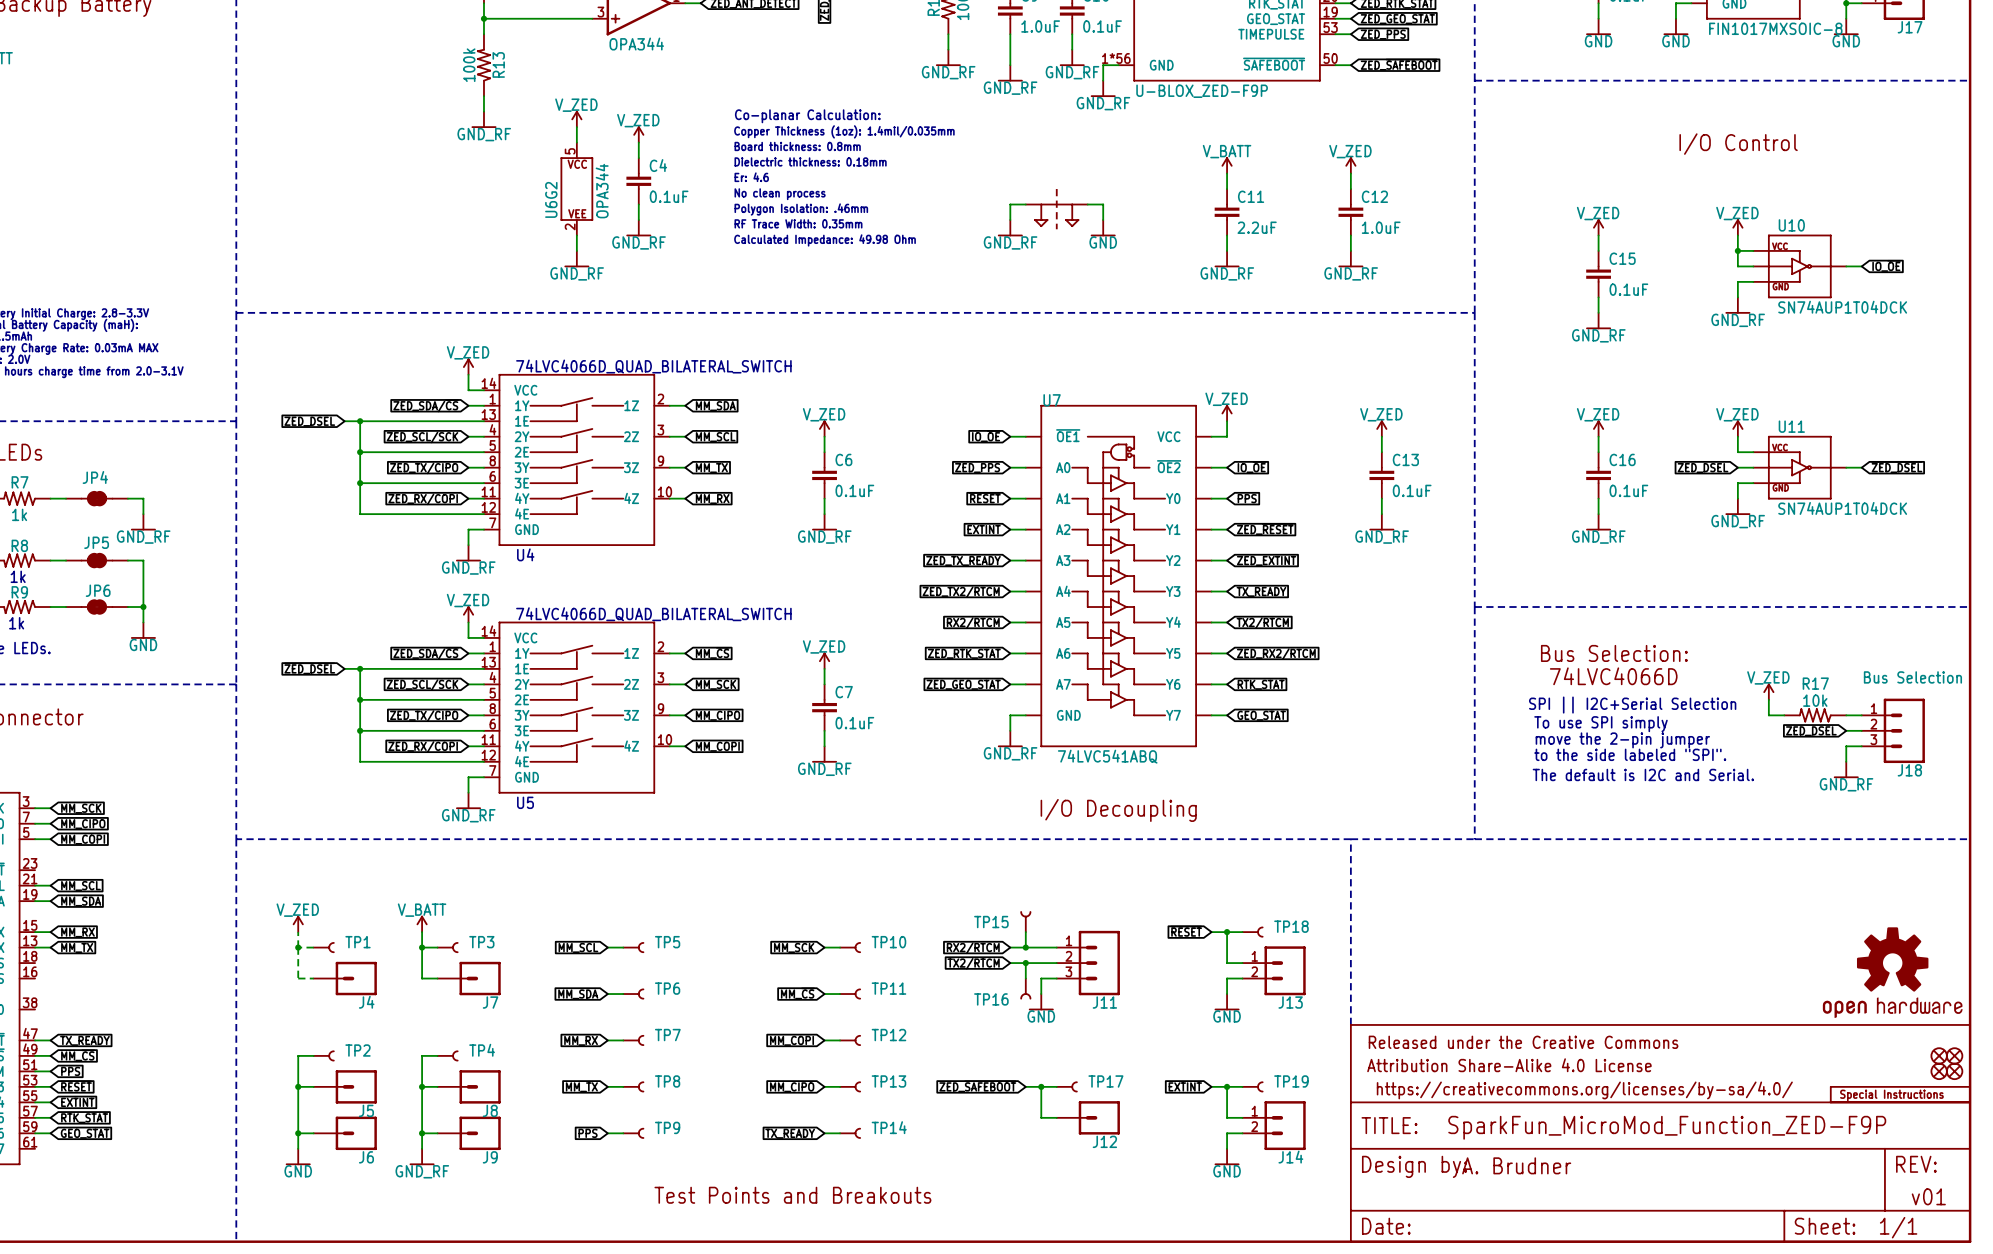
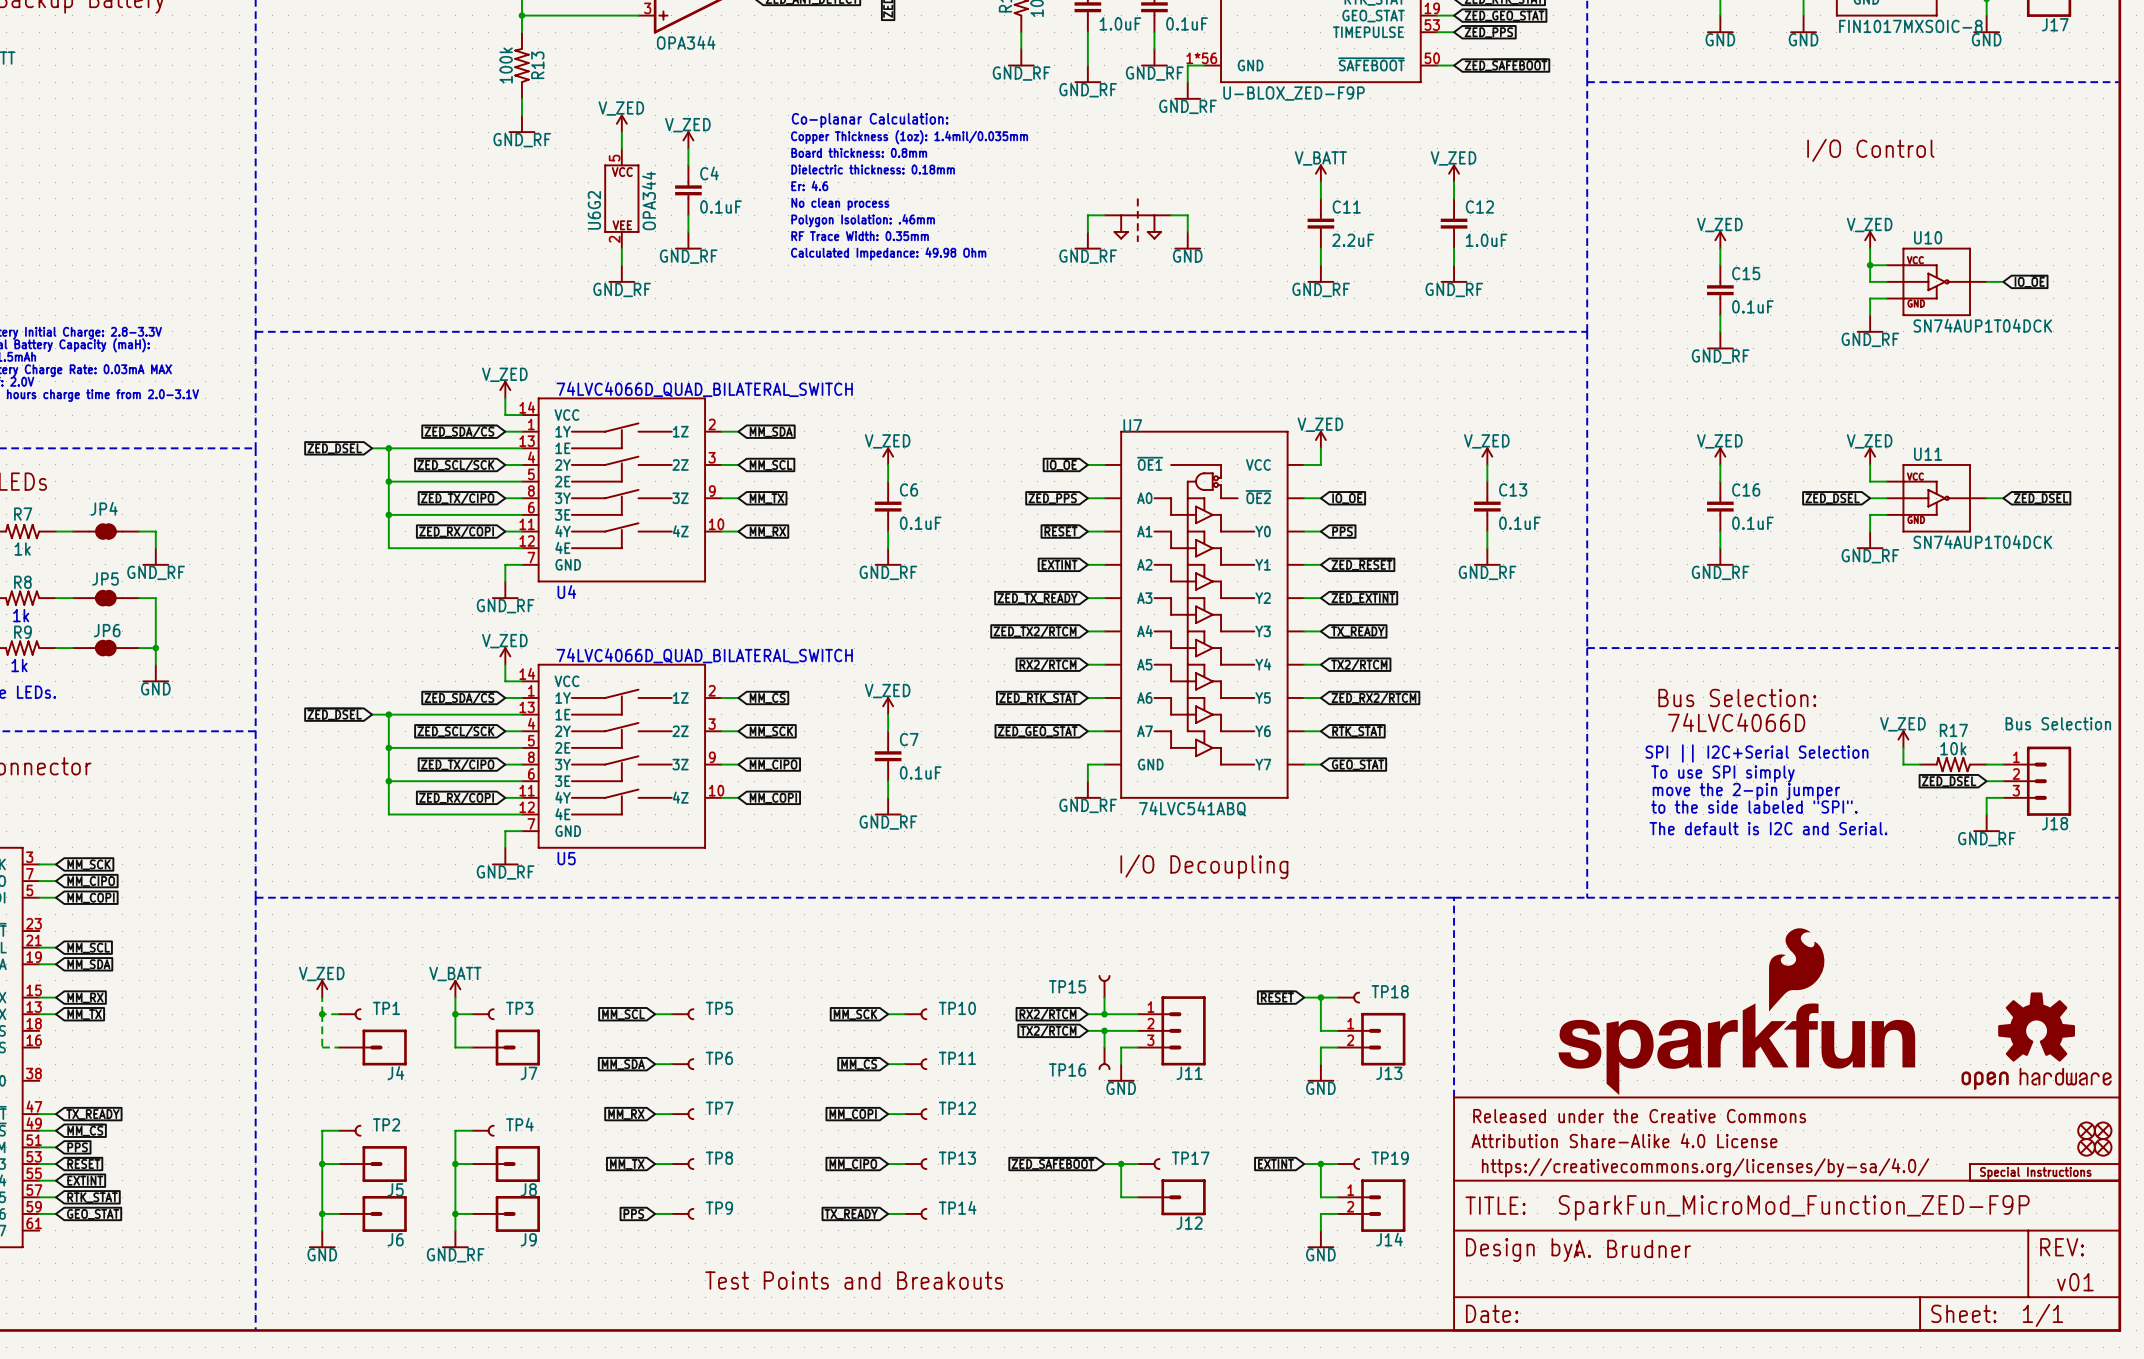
part: none -> (1736, 1011)

